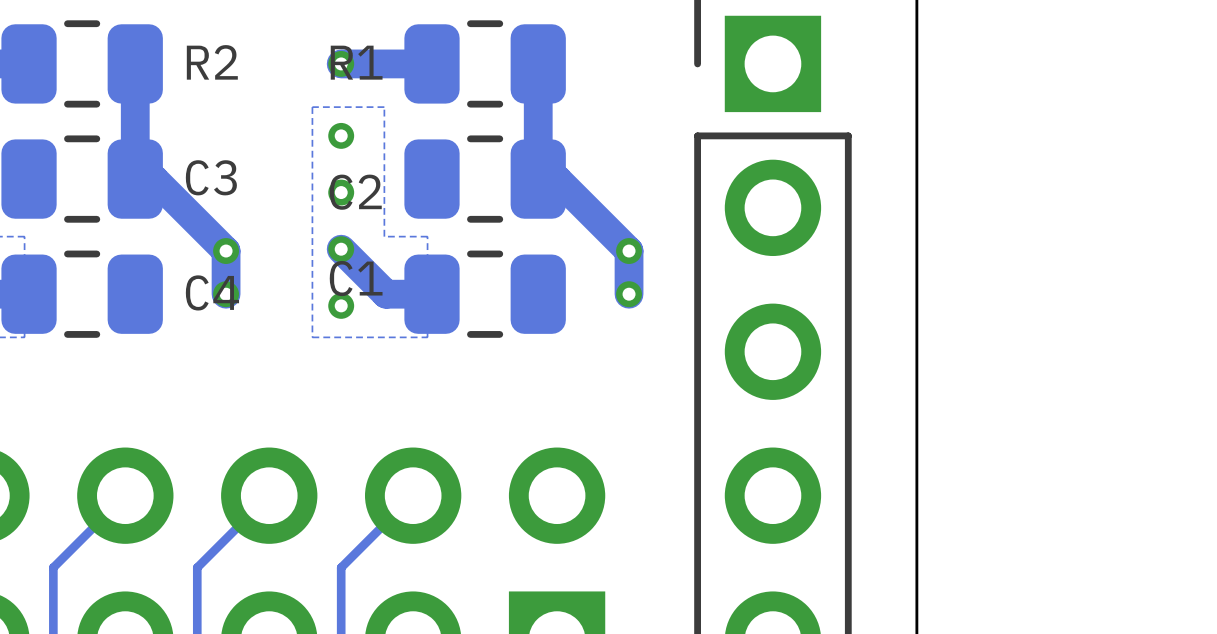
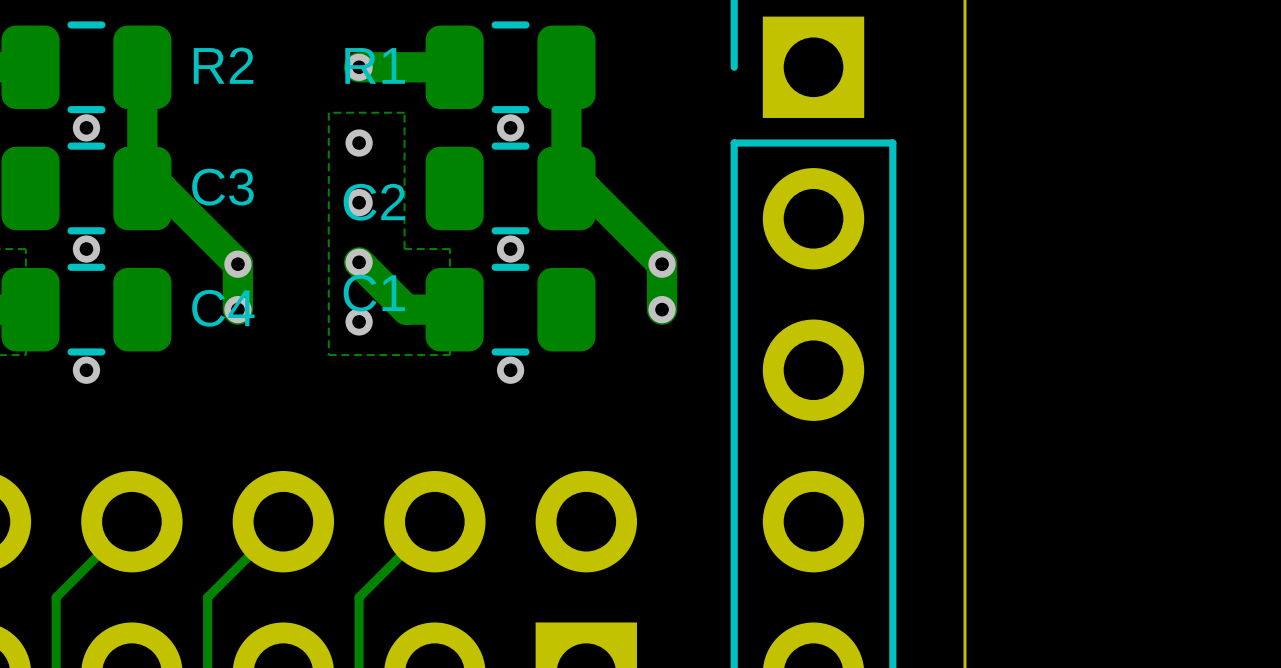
via: none -> (86, 127)
via: none -> (510, 127)
via: none -> (86, 249)
via: none -> (510, 249)
via: none -> (86, 370)
via: none -> (510, 370)

